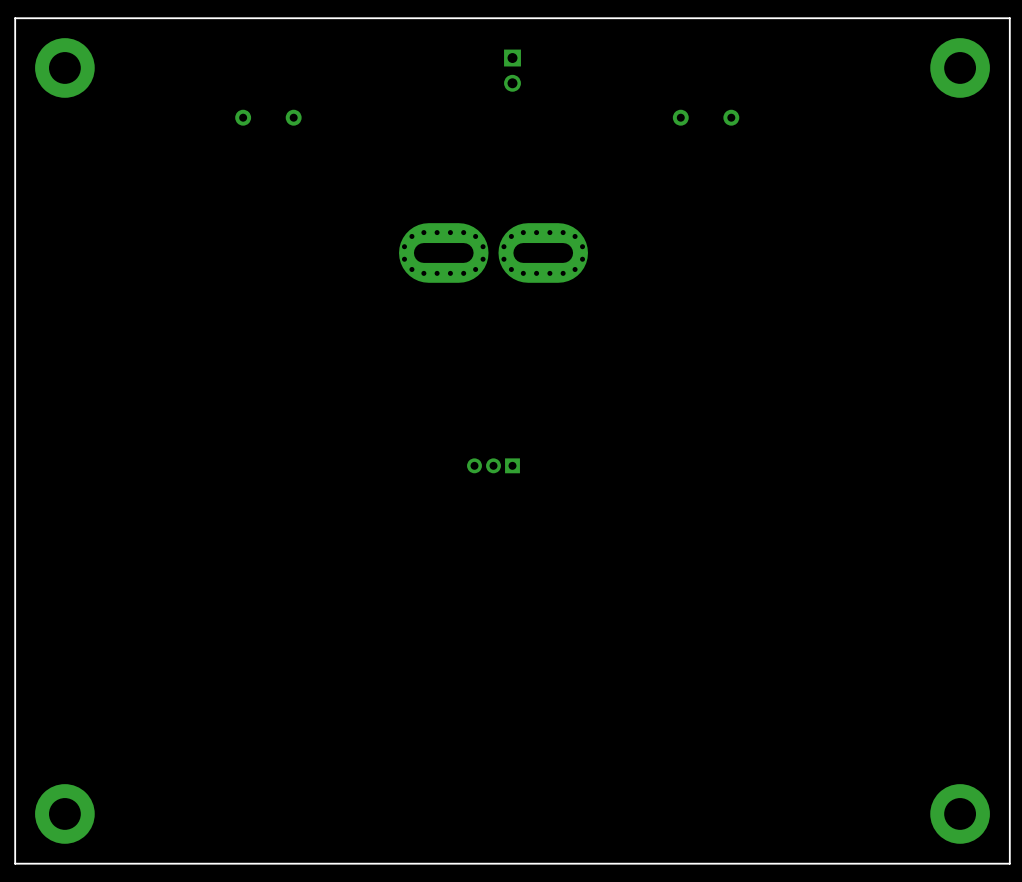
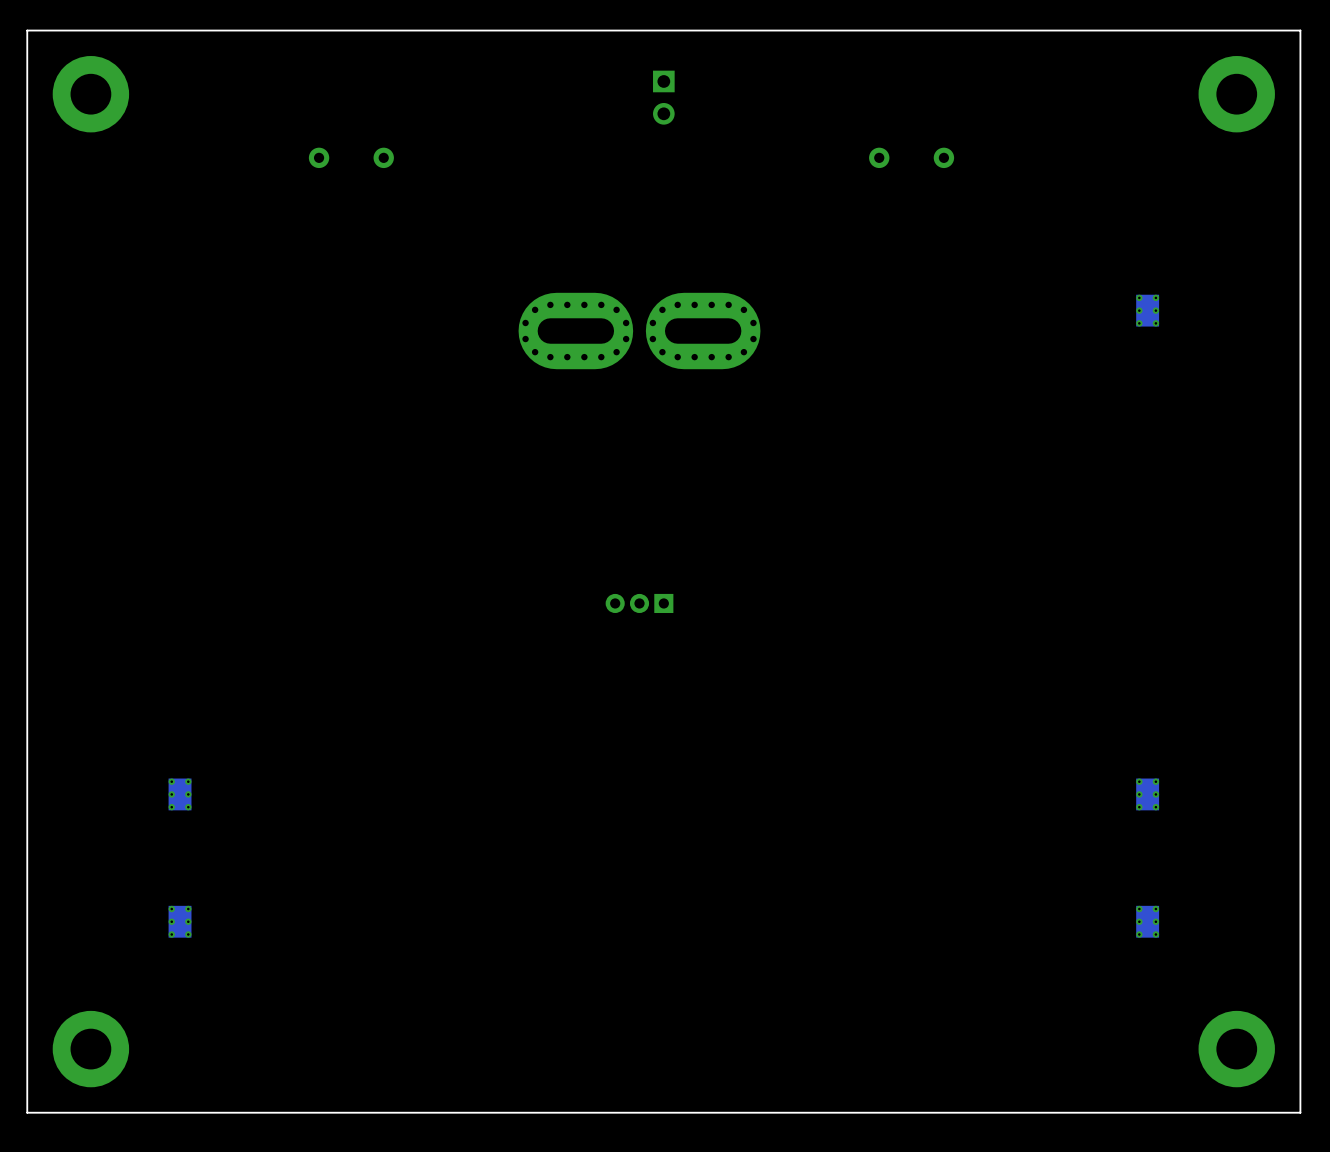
part: none -> (1147, 310)
part: none -> (180, 794)
part: none -> (1147, 794)
part: none -> (180, 921)
part: none -> (1147, 921)

